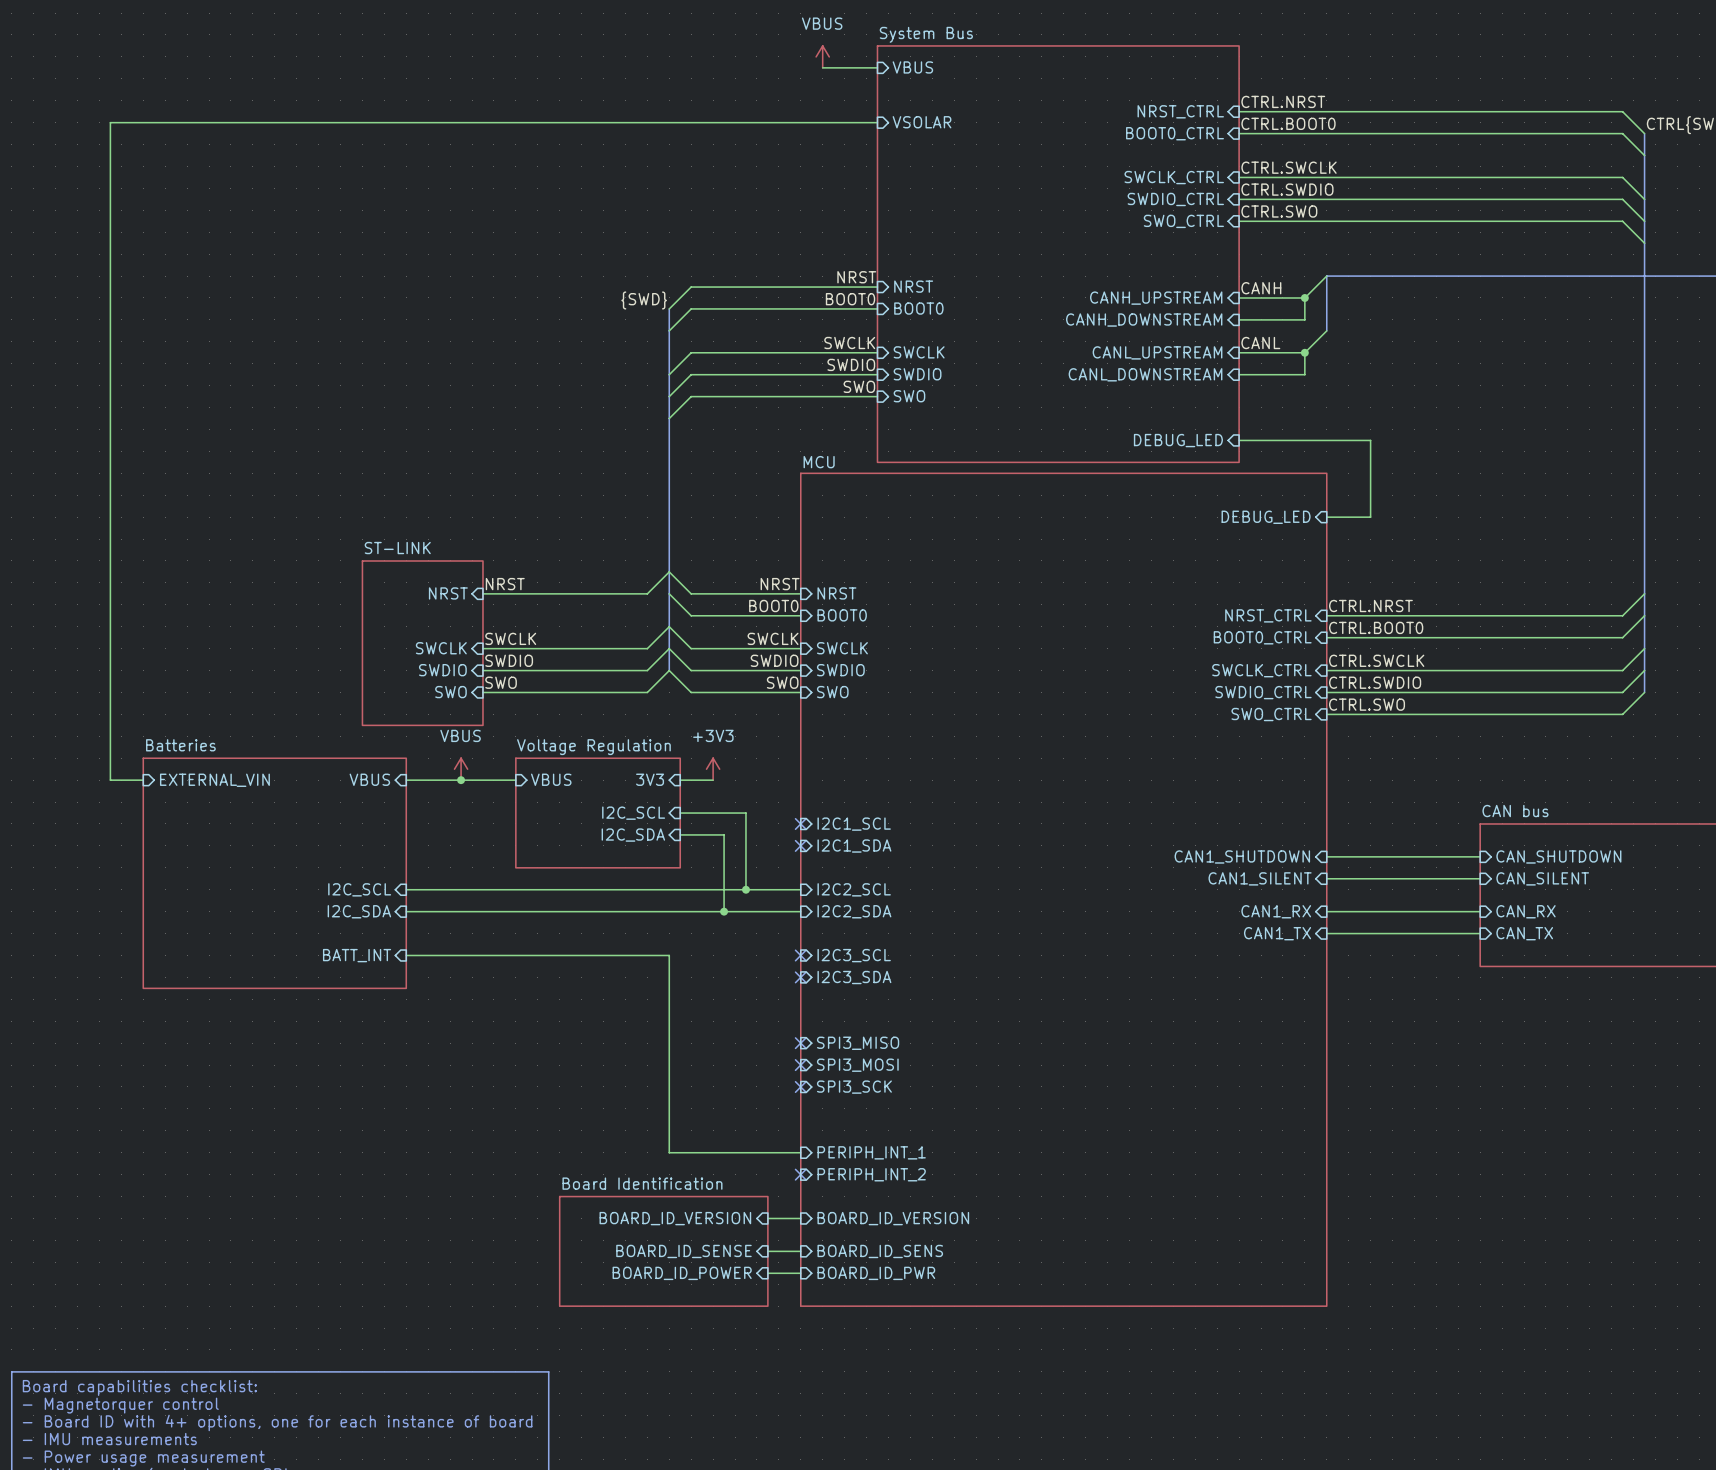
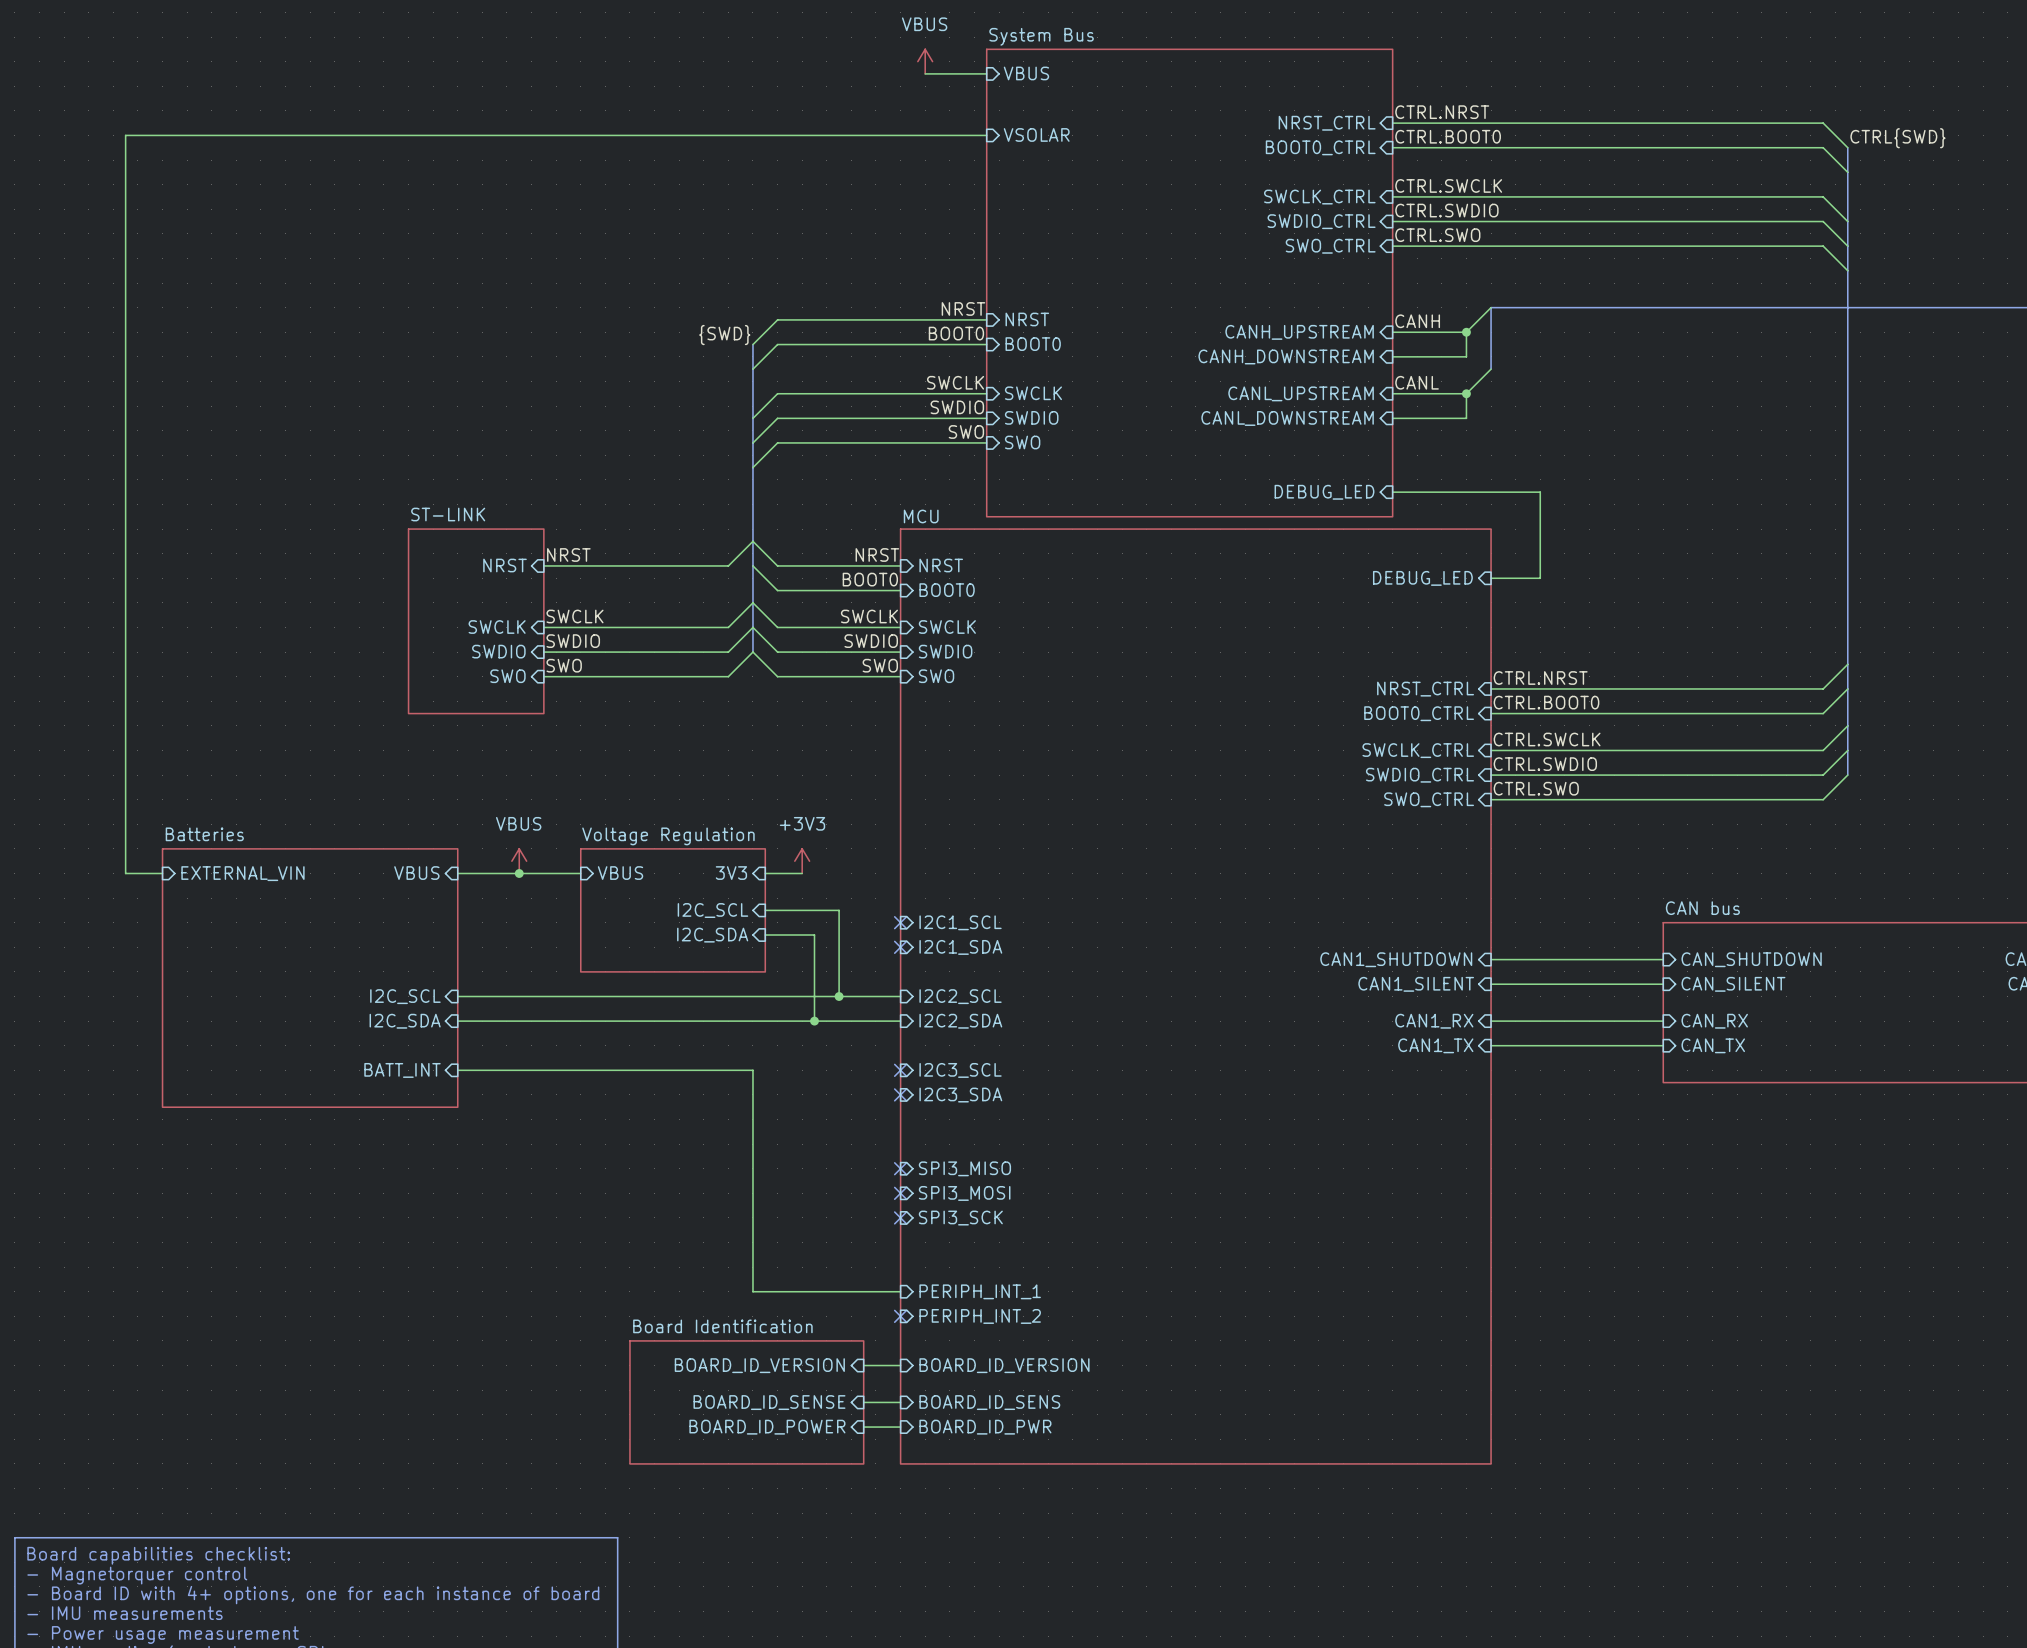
bus: (669, 582) (669, 670) -> none
label position: NRST (505, 584) -> NRST (568, 554)
label position: NRST (780, 584) -> NRST (877, 554)
sheet pin position: NRST (448, 593) -> NRST (505, 565)
wire: (482, 593) (647, 593) (669, 571) (691, 593) (800, 593) -> (543, 565) (728, 565) (752, 541) (777, 565) (900, 565)
wire: (669, 593) (691, 615) (800, 615) -> (752, 565) (777, 590) (900, 590)
sheet pin position: NRST (836, 593) -> NRST (941, 565)
label position: BOOT0 (773, 606) -> BOOT0 (870, 579)
sheet pin position: BOOT0 (842, 615) -> BOOT0 (947, 590)
label position: SWCLK (510, 638) -> SWCLK (575, 616)
label position: SWCLK (773, 638) -> SWCLK (869, 616)
sheet ST-LINK position: (422, 643) -> (476, 621)
sheet pin position: SWCLK (441, 648) -> SWCLK (497, 627)
wire: (482, 648) (647, 648) (669, 626) (691, 648) (800, 648) -> (543, 627) (728, 627) (752, 602) (777, 627) (900, 627)
sheet pin position: SWCLK (842, 648) -> SWCLK (947, 627)
label position: SWDIO (509, 660) -> SWDIO (573, 641)
label position: SWDIO (774, 660) -> SWDIO (871, 641)
sheet pin position: SWDIO (442, 670) -> SWDIO (498, 651)
wire: (482, 670) (647, 670) (669, 648) (691, 670) (800, 670) -> (543, 652) (728, 652) (752, 627) (777, 652) (900, 652)
sheet pin position: SWDIO (840, 670) -> SWDIO (945, 651)
label position: SWO (501, 682) -> SWO (564, 665)
label position: SWO (782, 682) -> SWO (880, 665)
sheet pin position: SWO (450, 692) -> SWO (507, 676)
wire: (482, 692) (647, 692) (669, 670) (691, 692) (800, 692) -> (543, 676) (728, 676) (752, 652) (777, 676) (900, 676)
sheet pin position: SWO (832, 692) -> SWO (936, 676)

